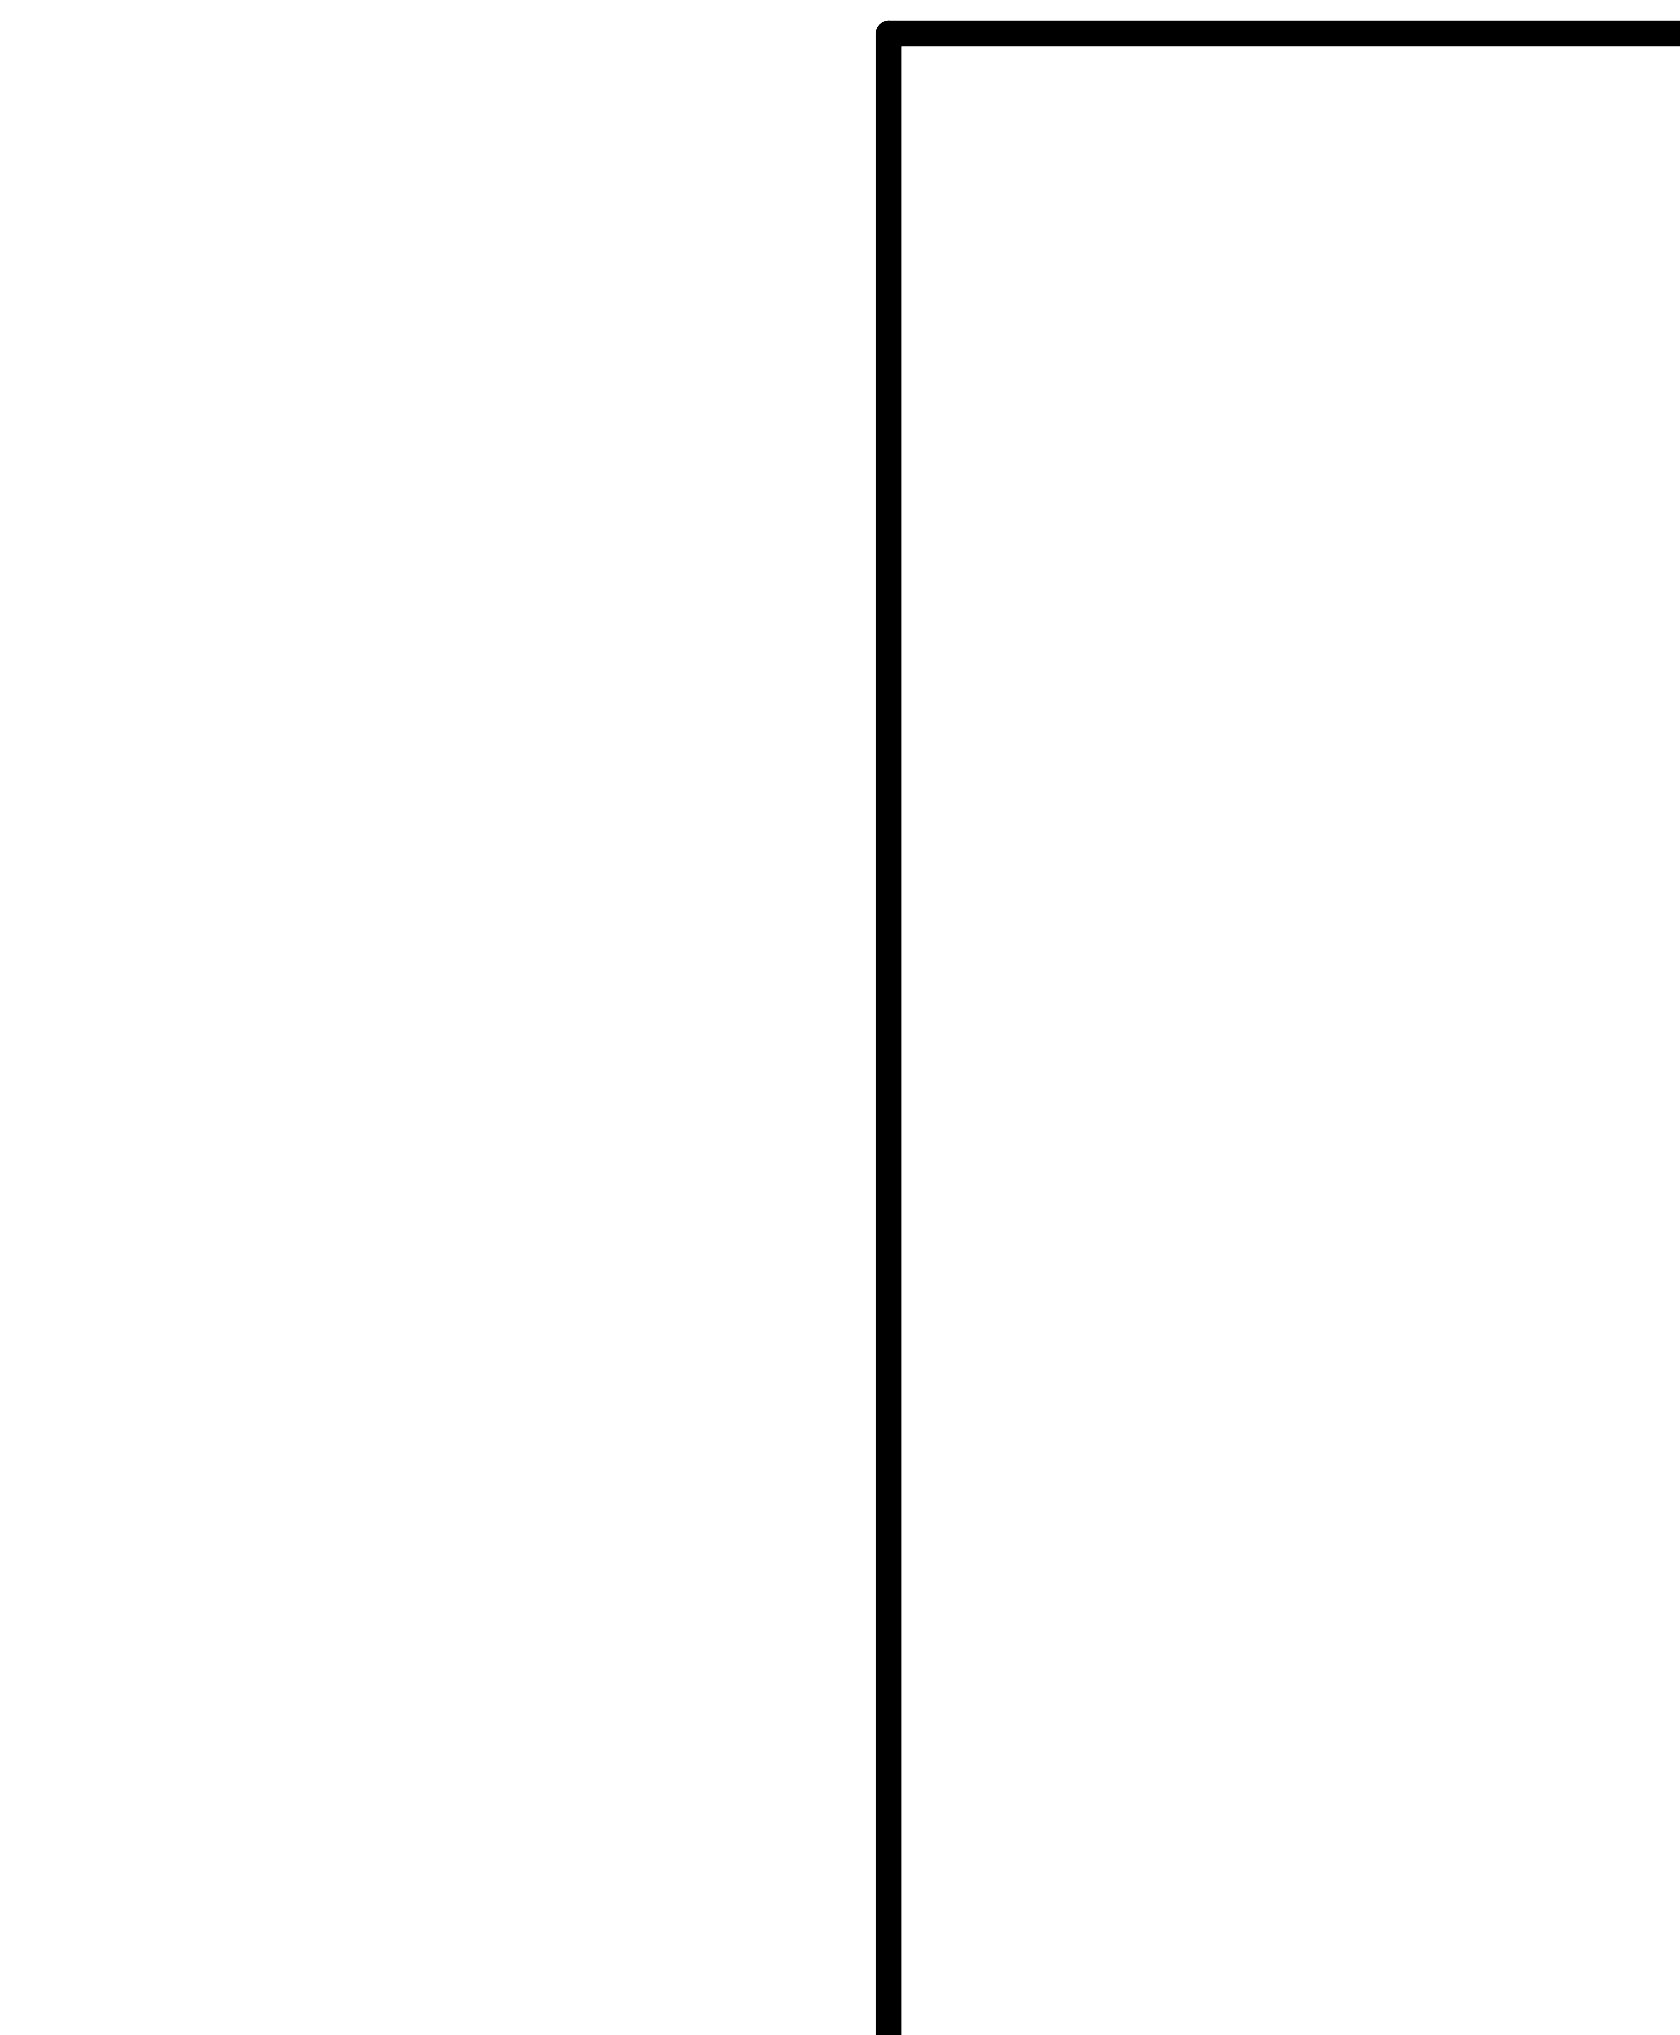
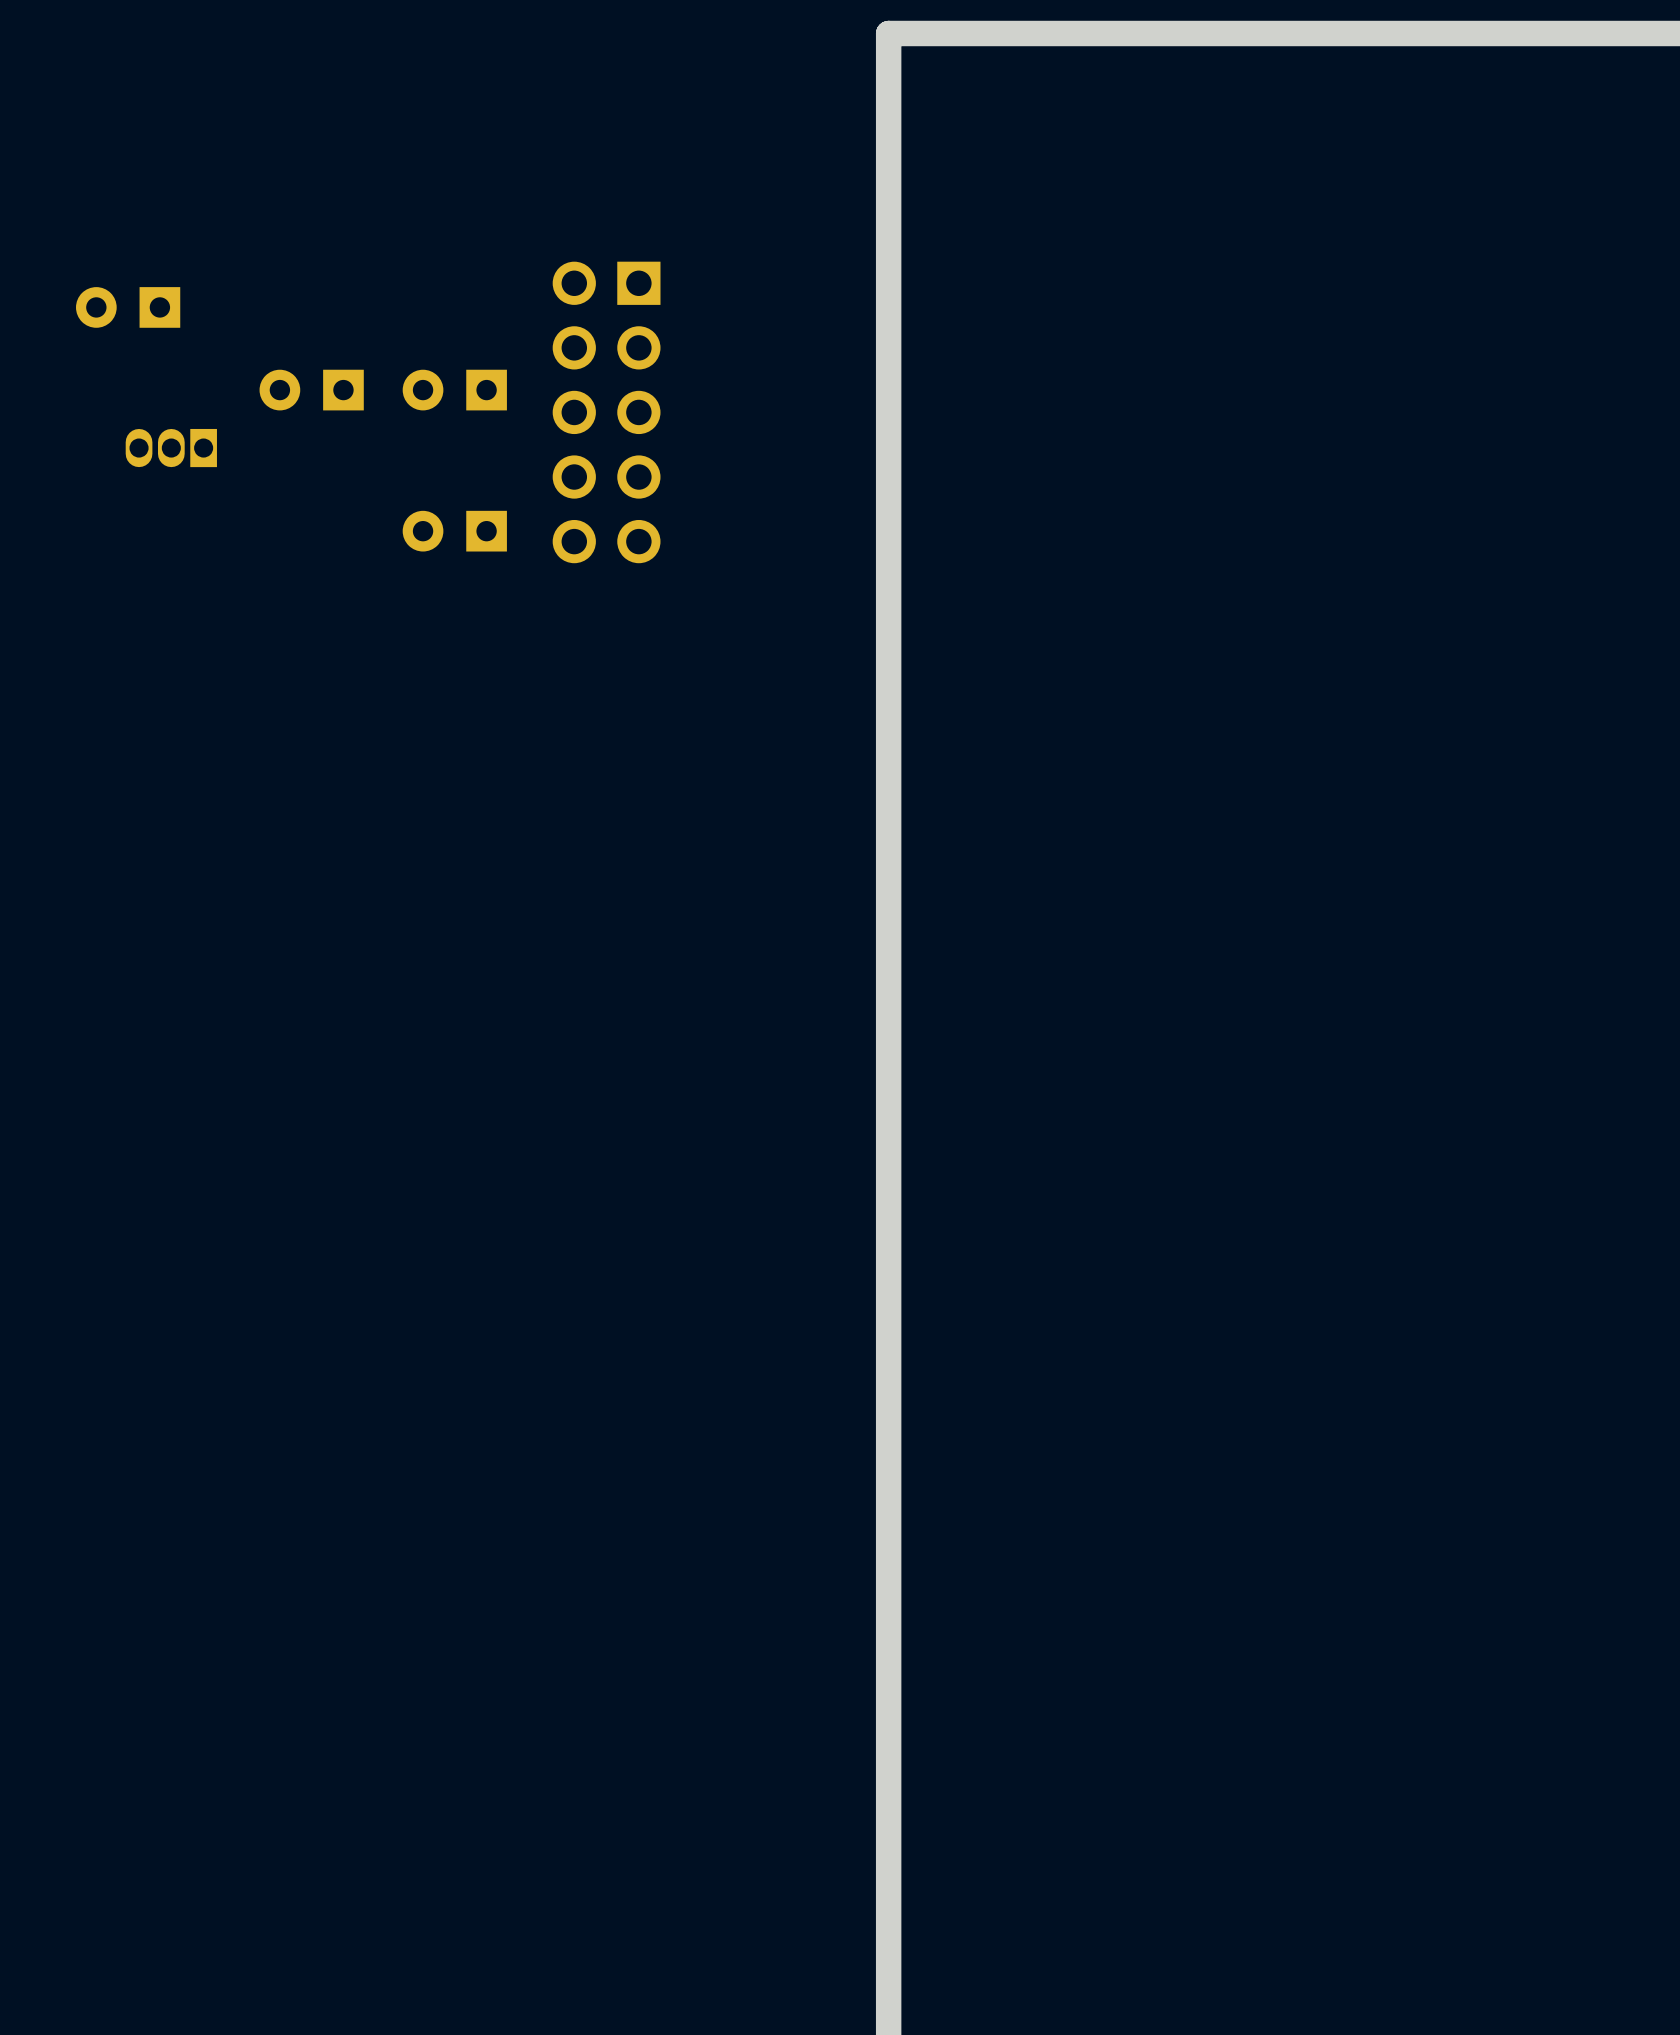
part: none -> (128, 307)
part: none -> (311, 390)
part: none -> (454, 390)
part: none -> (606, 412)
part: none -> (171, 448)
part: none -> (454, 531)

